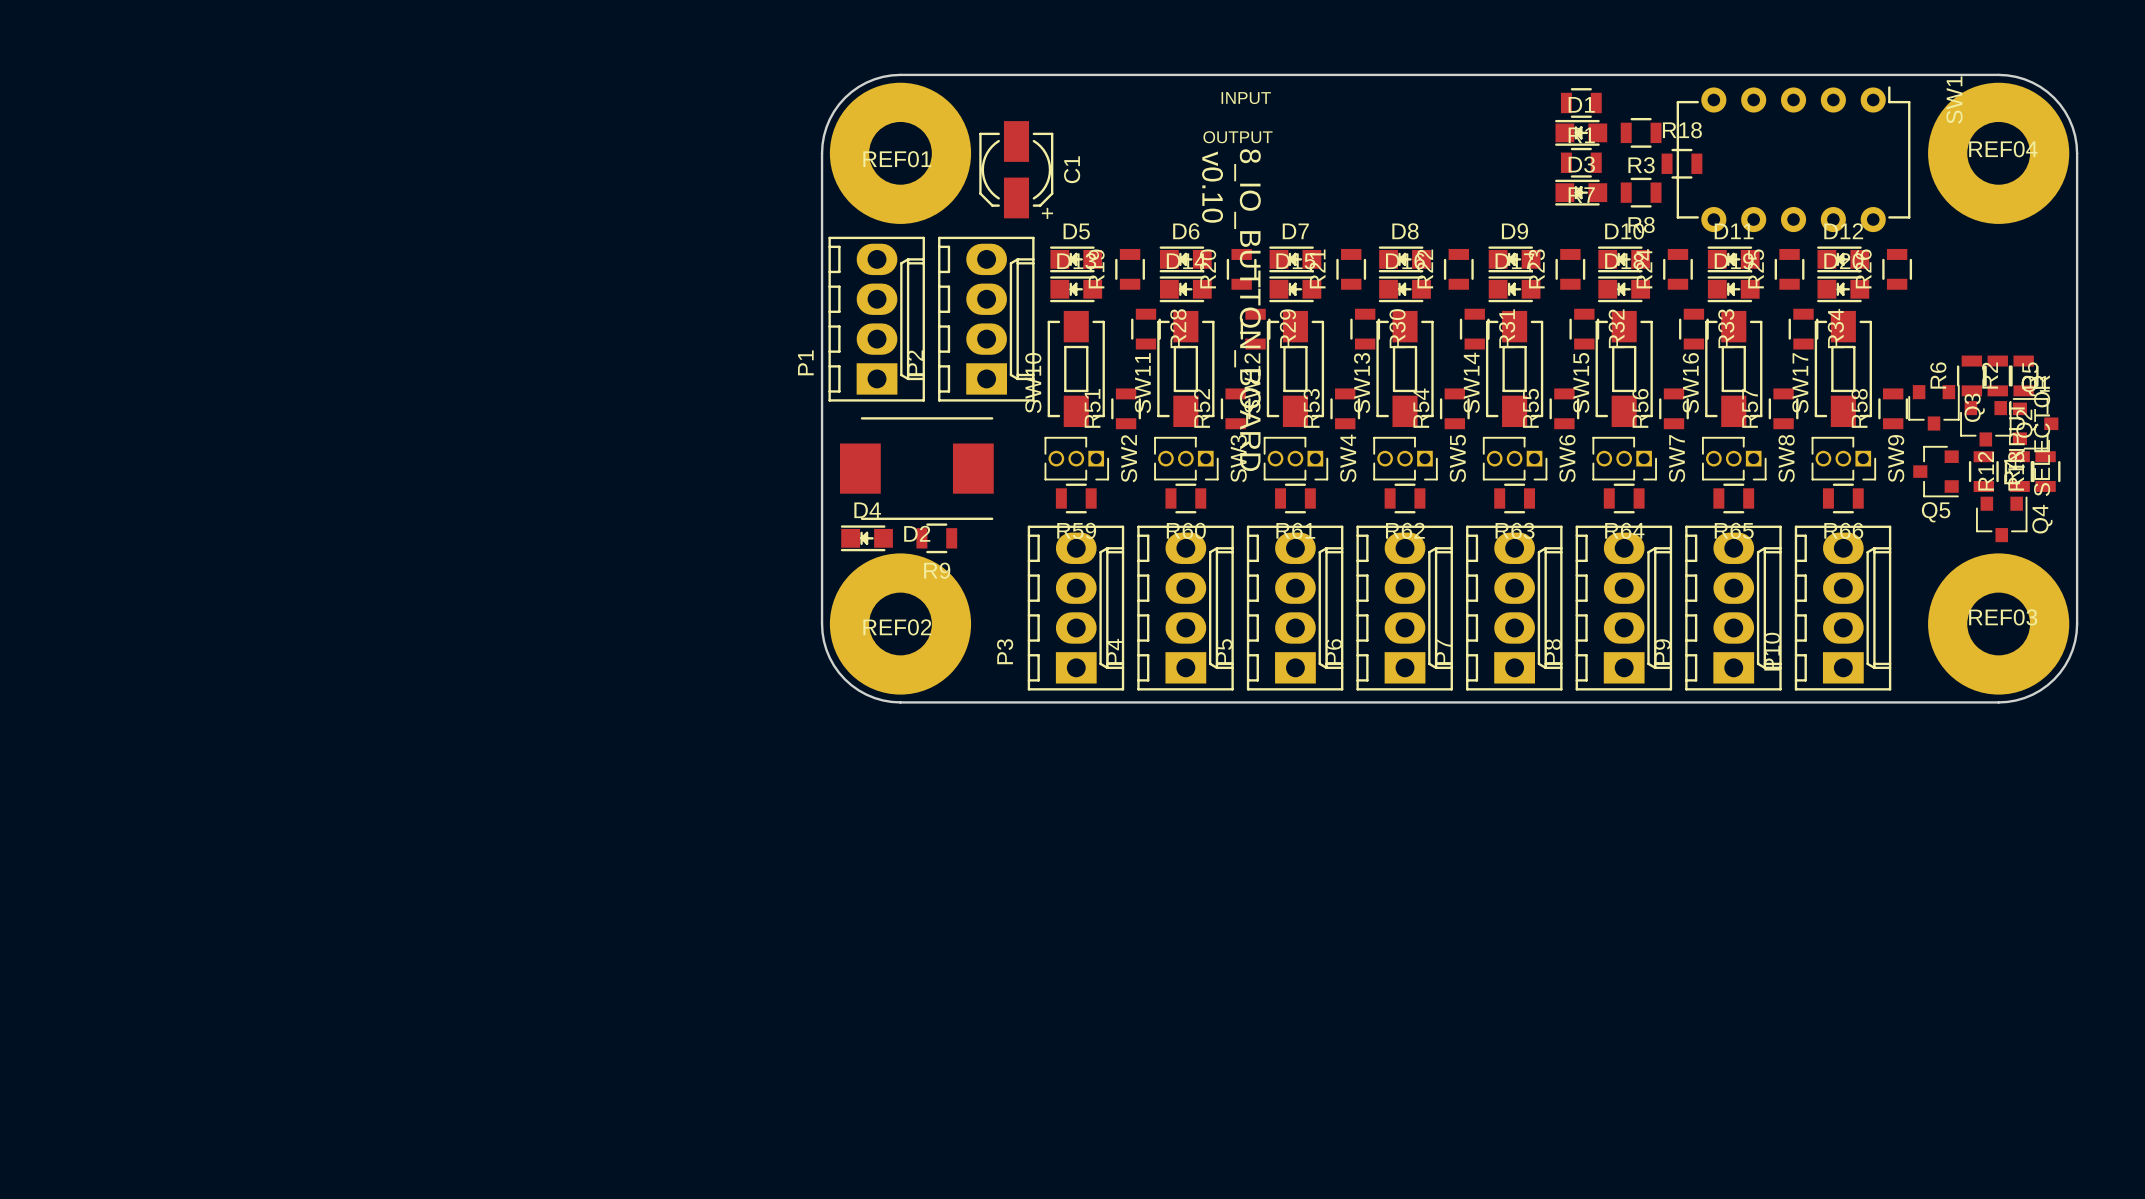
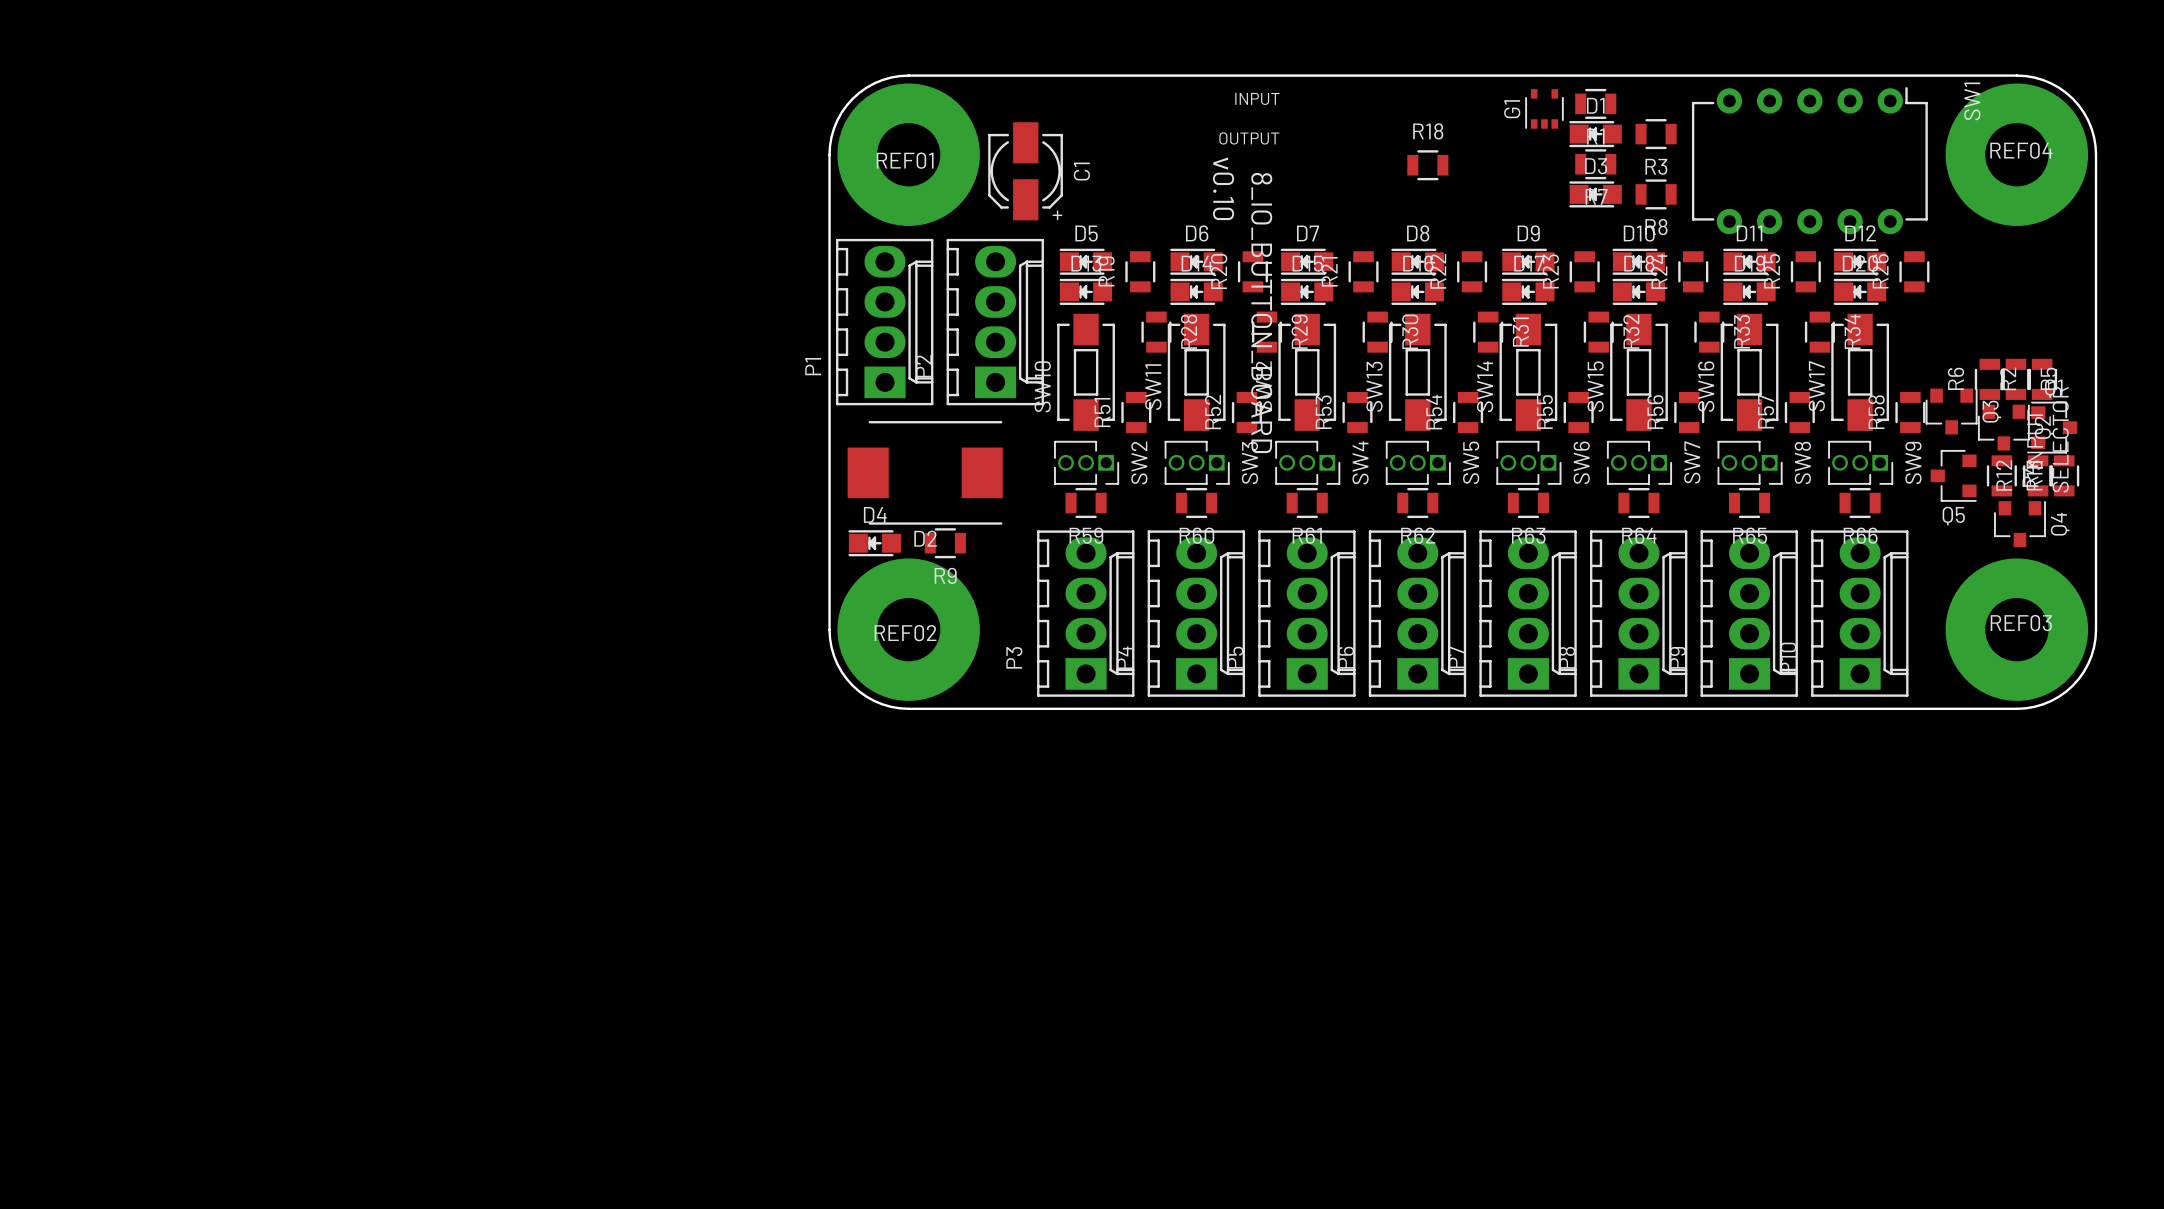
G1: none -> (1544, 109)
R18 position: (1681, 163) -> (1427, 165)

